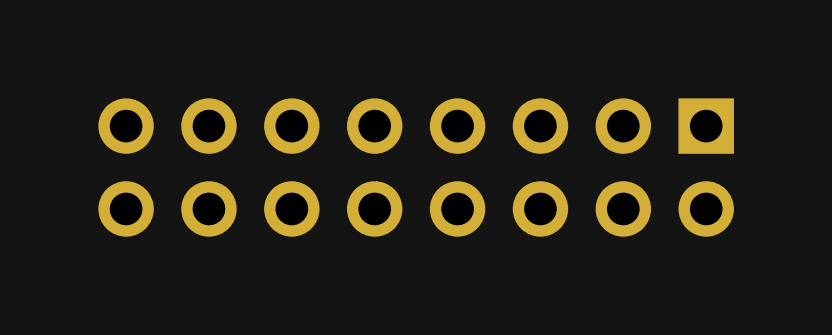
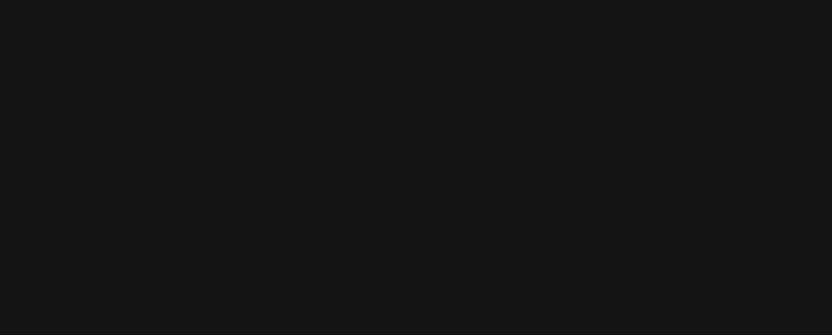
part: (416, 167) -> none

